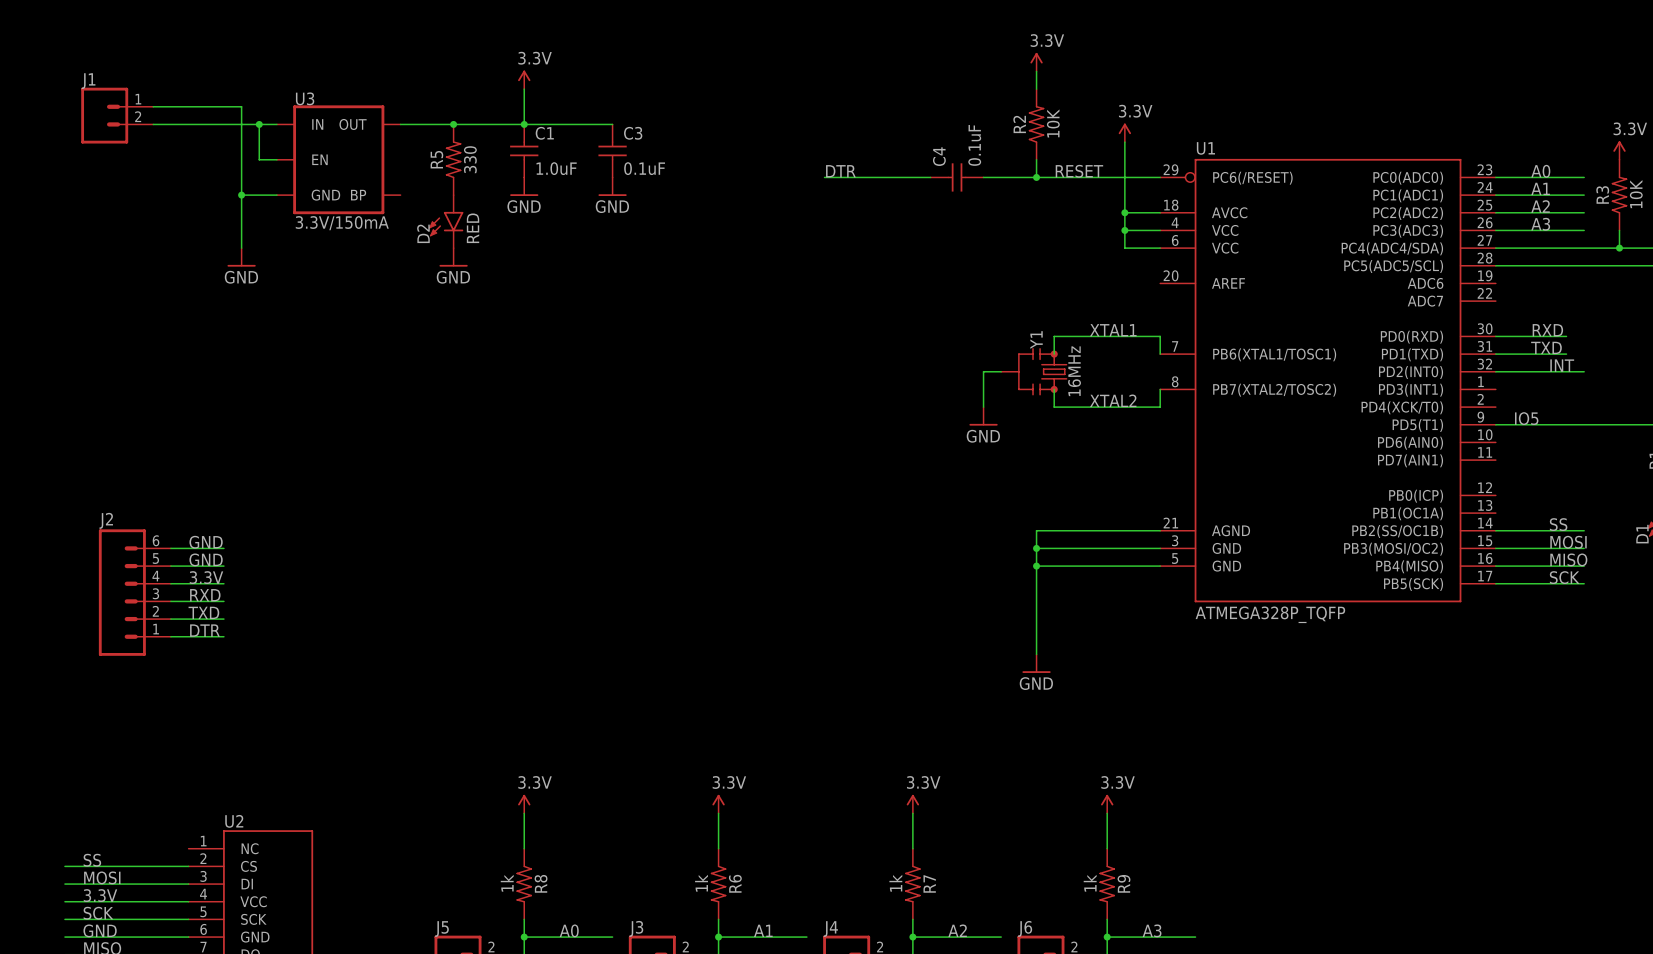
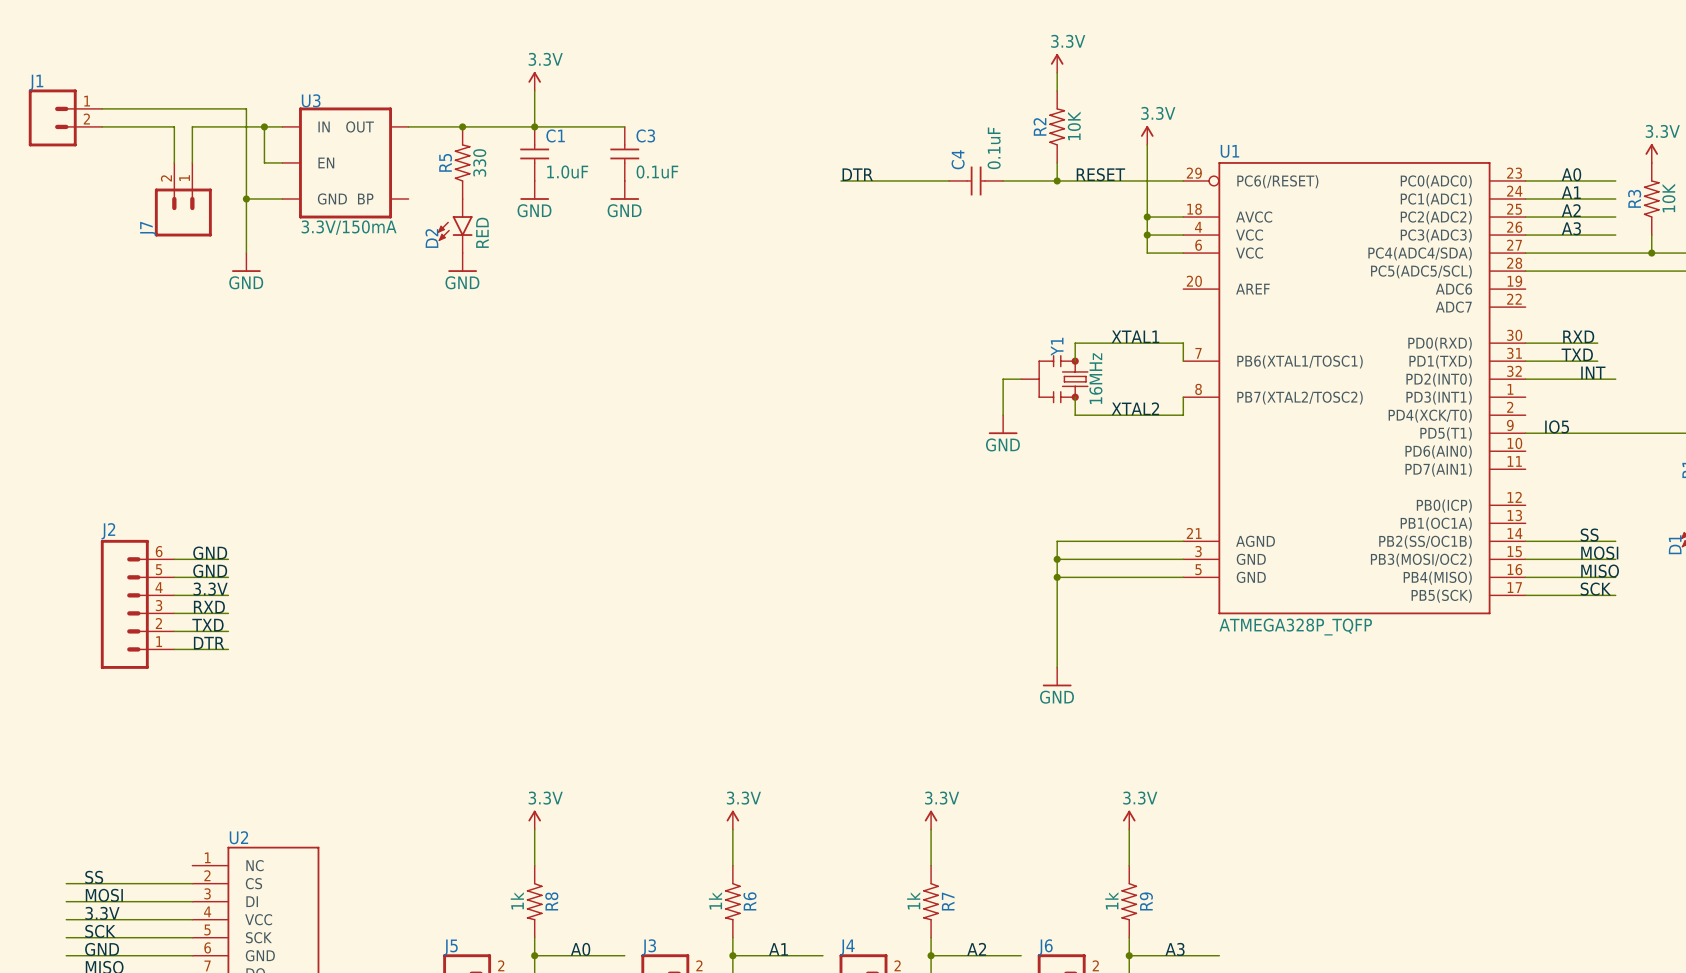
J1 position: (117, 115) -> (65, 117)
wire: (170, 124) (188, 124) -> (174, 126) (174, 162)
wire: none -> (192, 126) (192, 162)
J7: none -> (183, 199)

